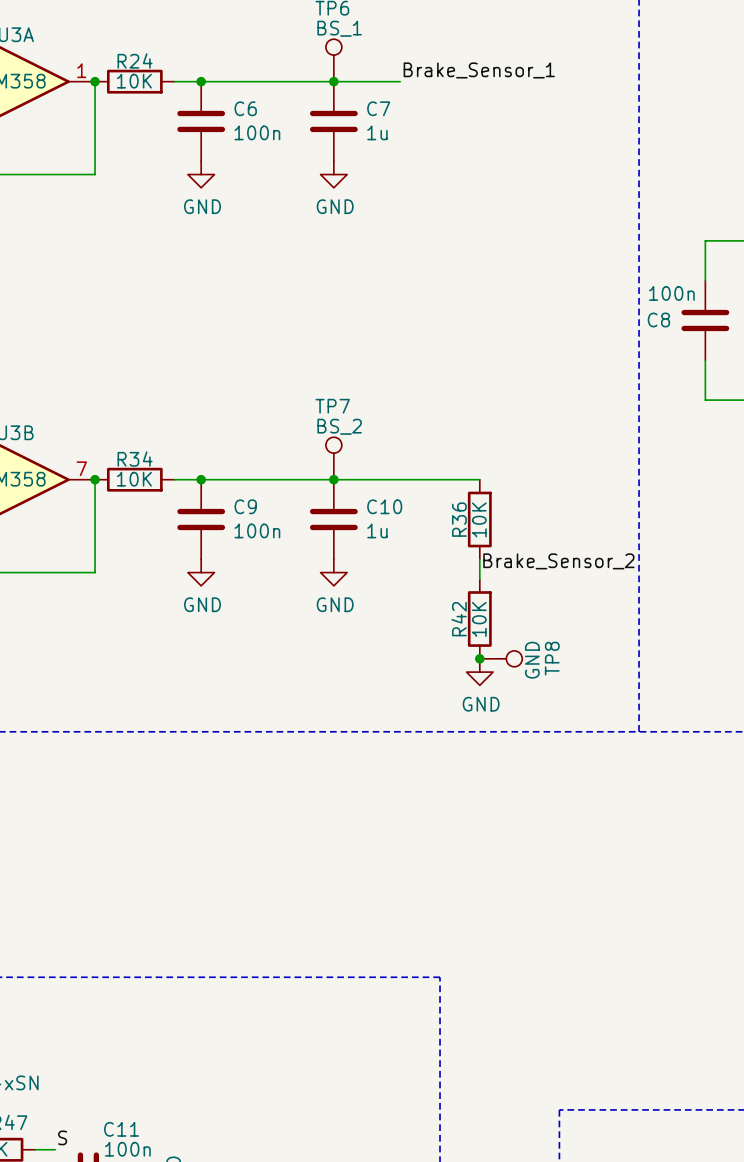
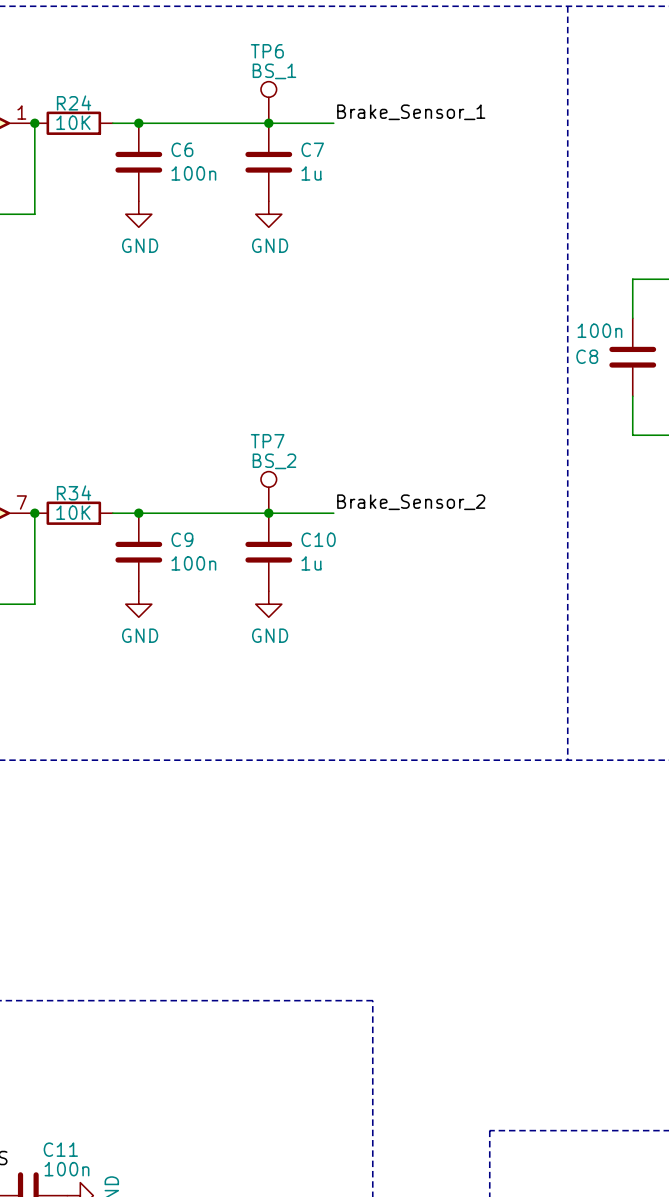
wire: (400, 479) (479, 479) -> none
R36: 10K (479, 519) -> none
wire: (479, 559) (479, 579) -> none
label position: Brake_Sensor_2 (558, 561) -> Brake_Sensor_2 (411, 502)
R42: 10K (479, 619) -> none
junction: (479, 658) -> none
TP8: GND (501, 658) -> none
power symbol: GND (479, 672) -> none

